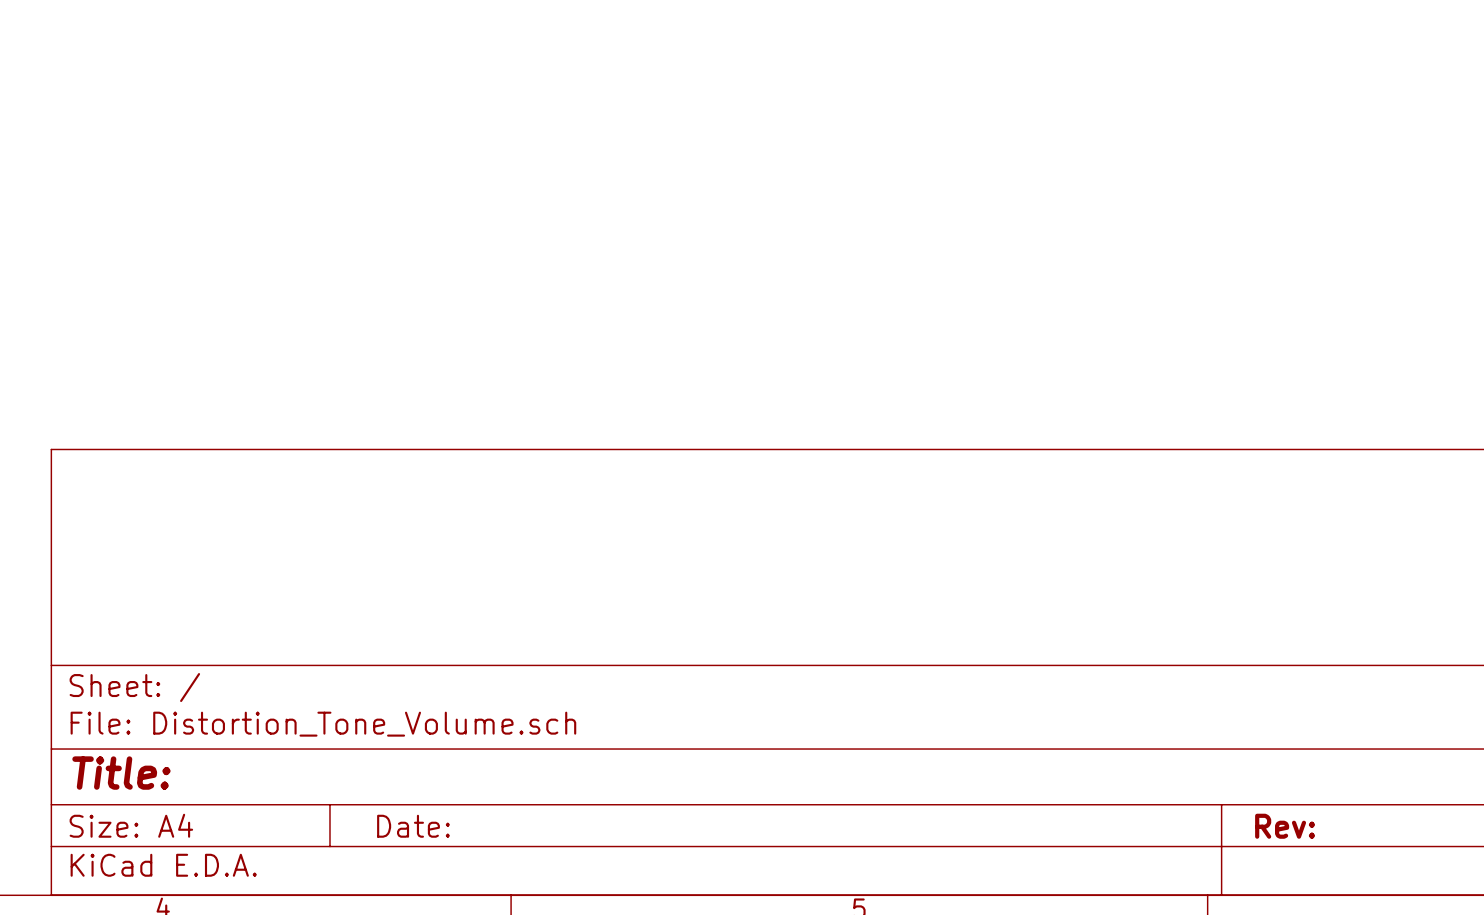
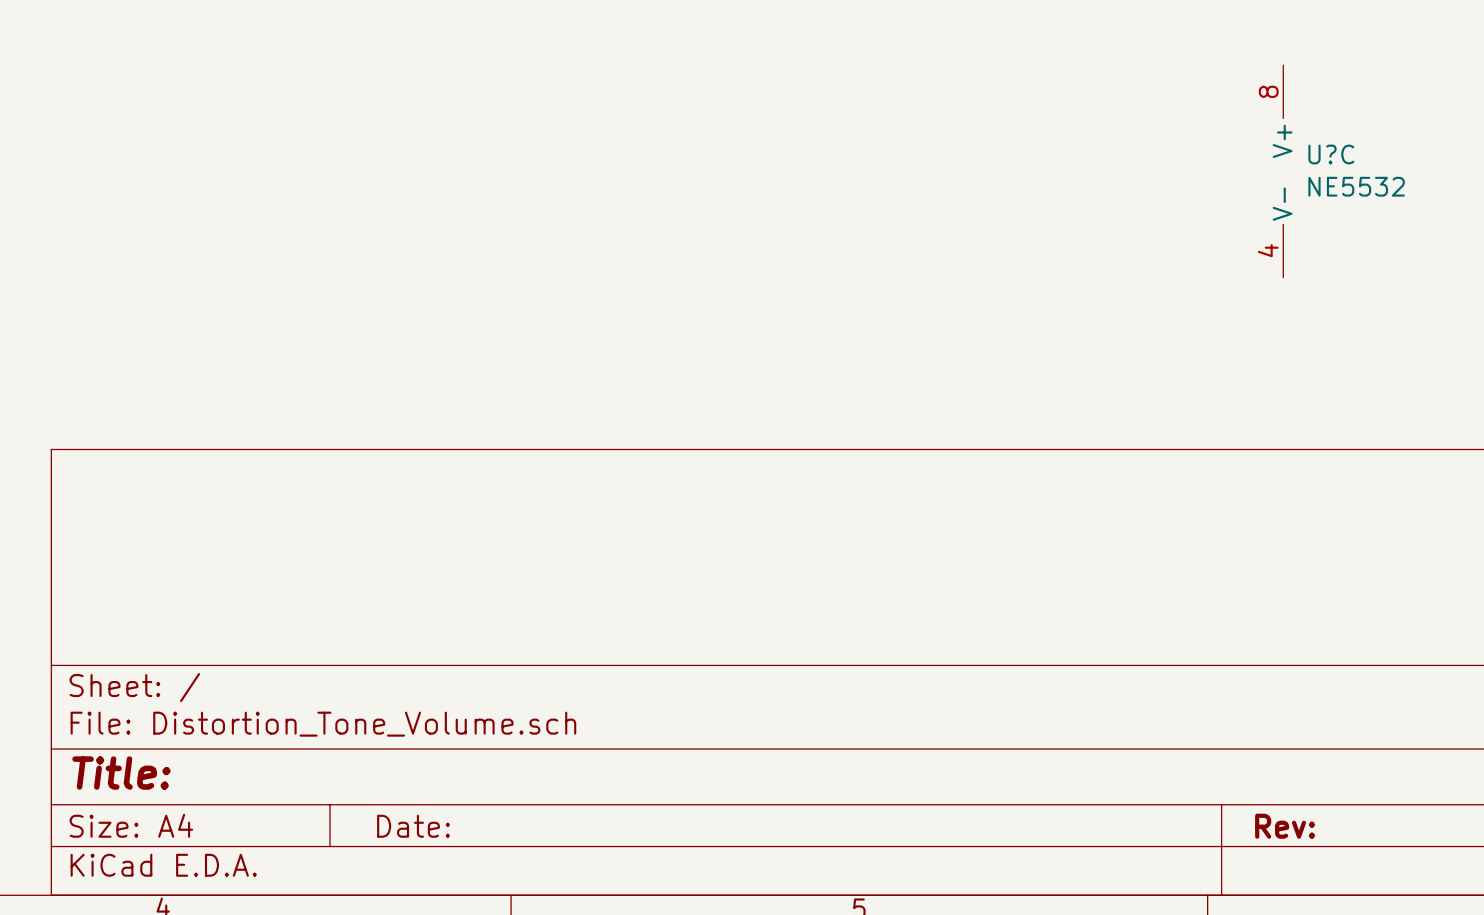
U?C: none -> NE5532 (1283, 171)

